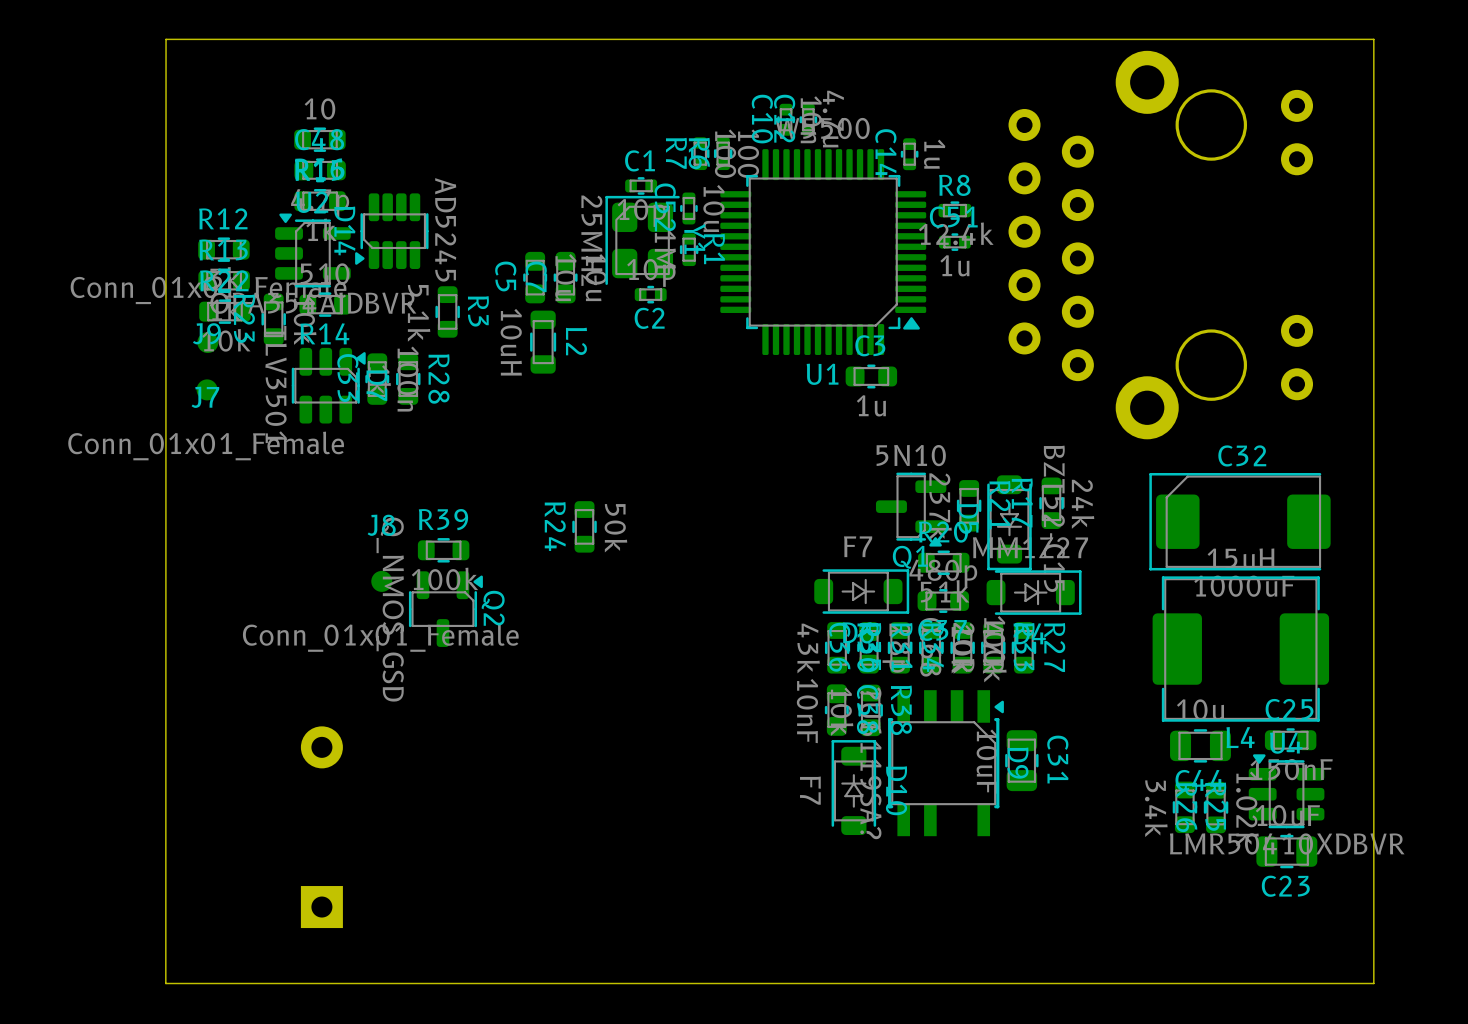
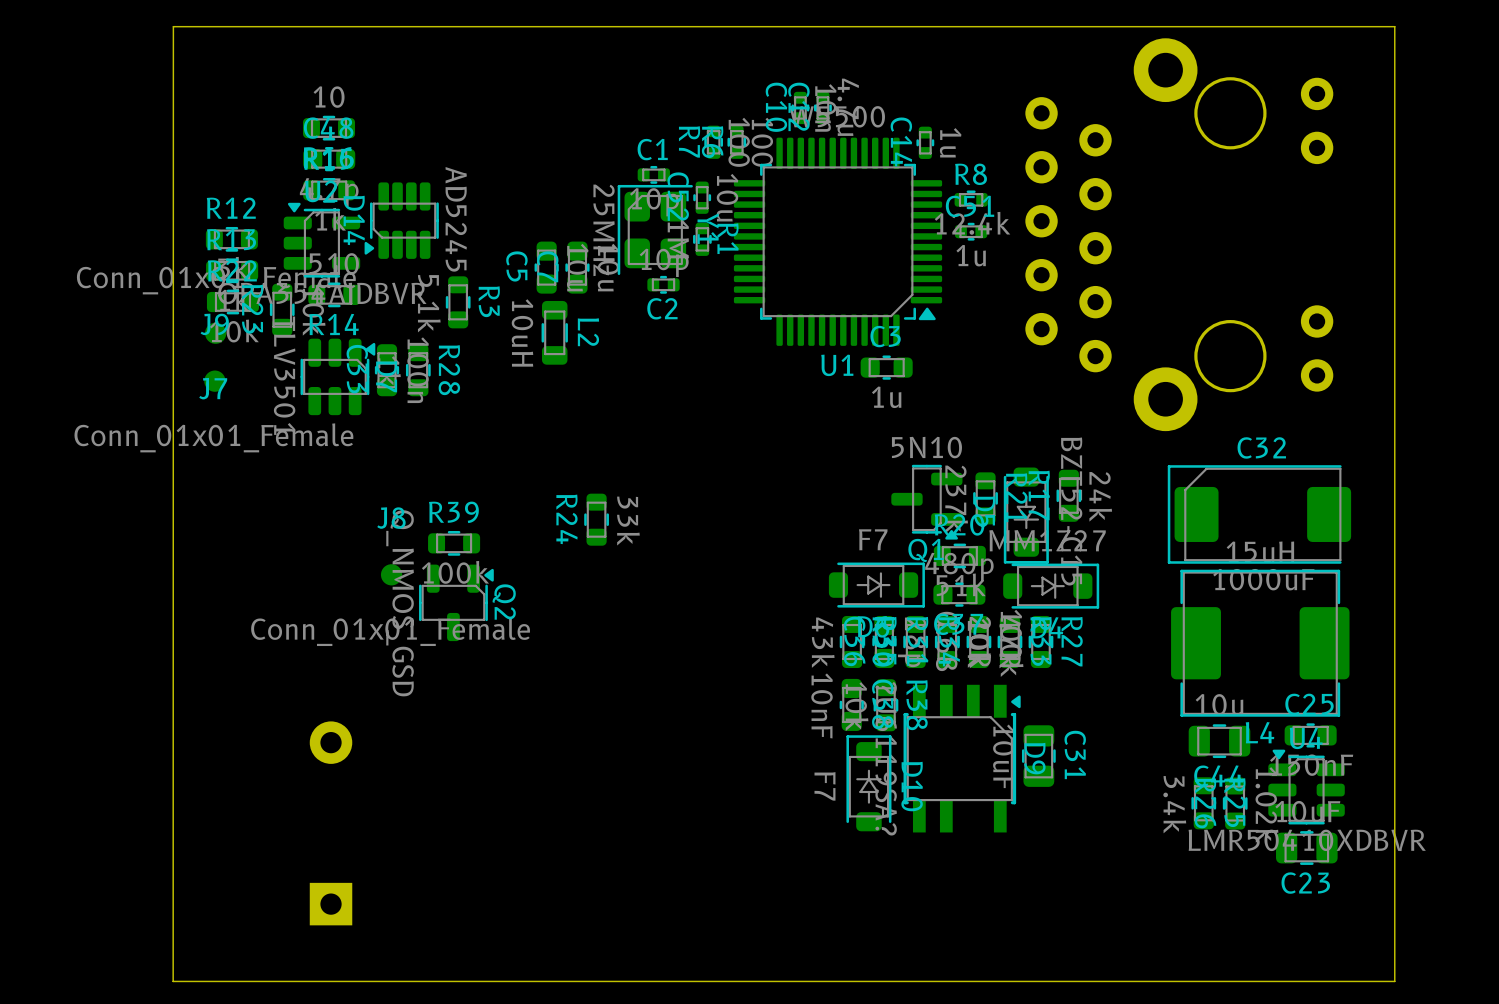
R24 value: 50k (615, 528) -> 33k (628, 521)

